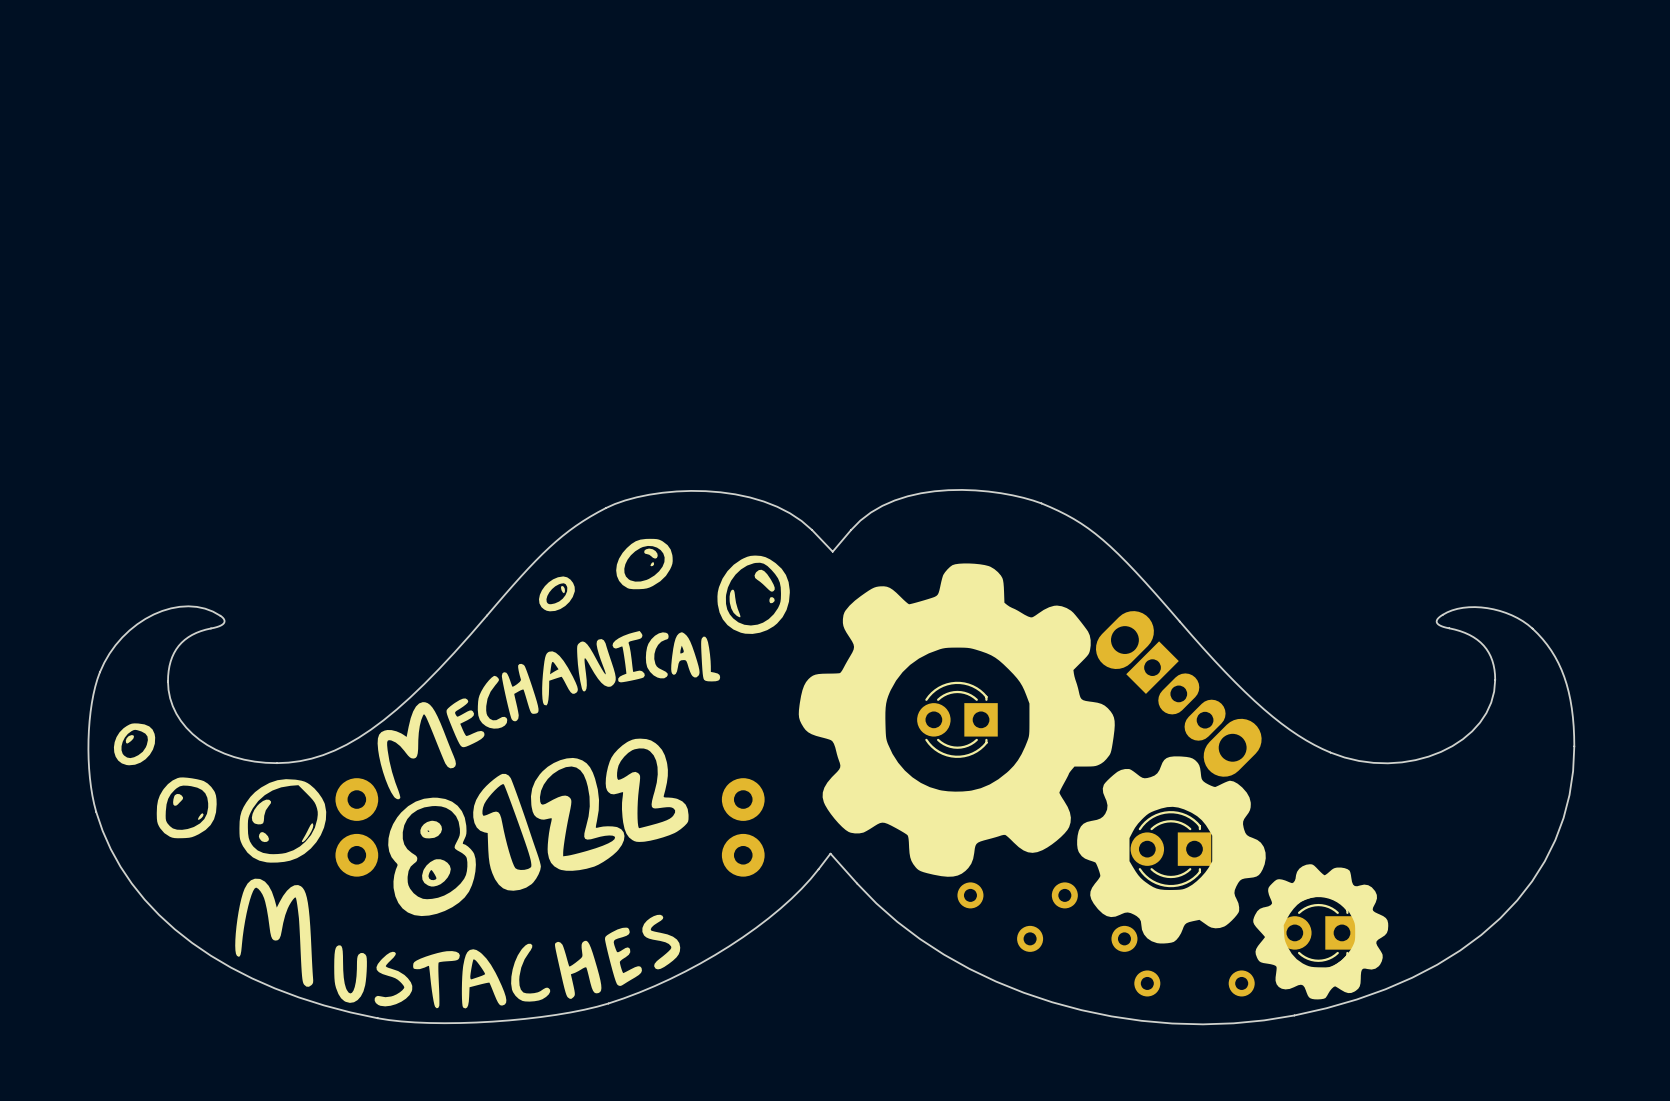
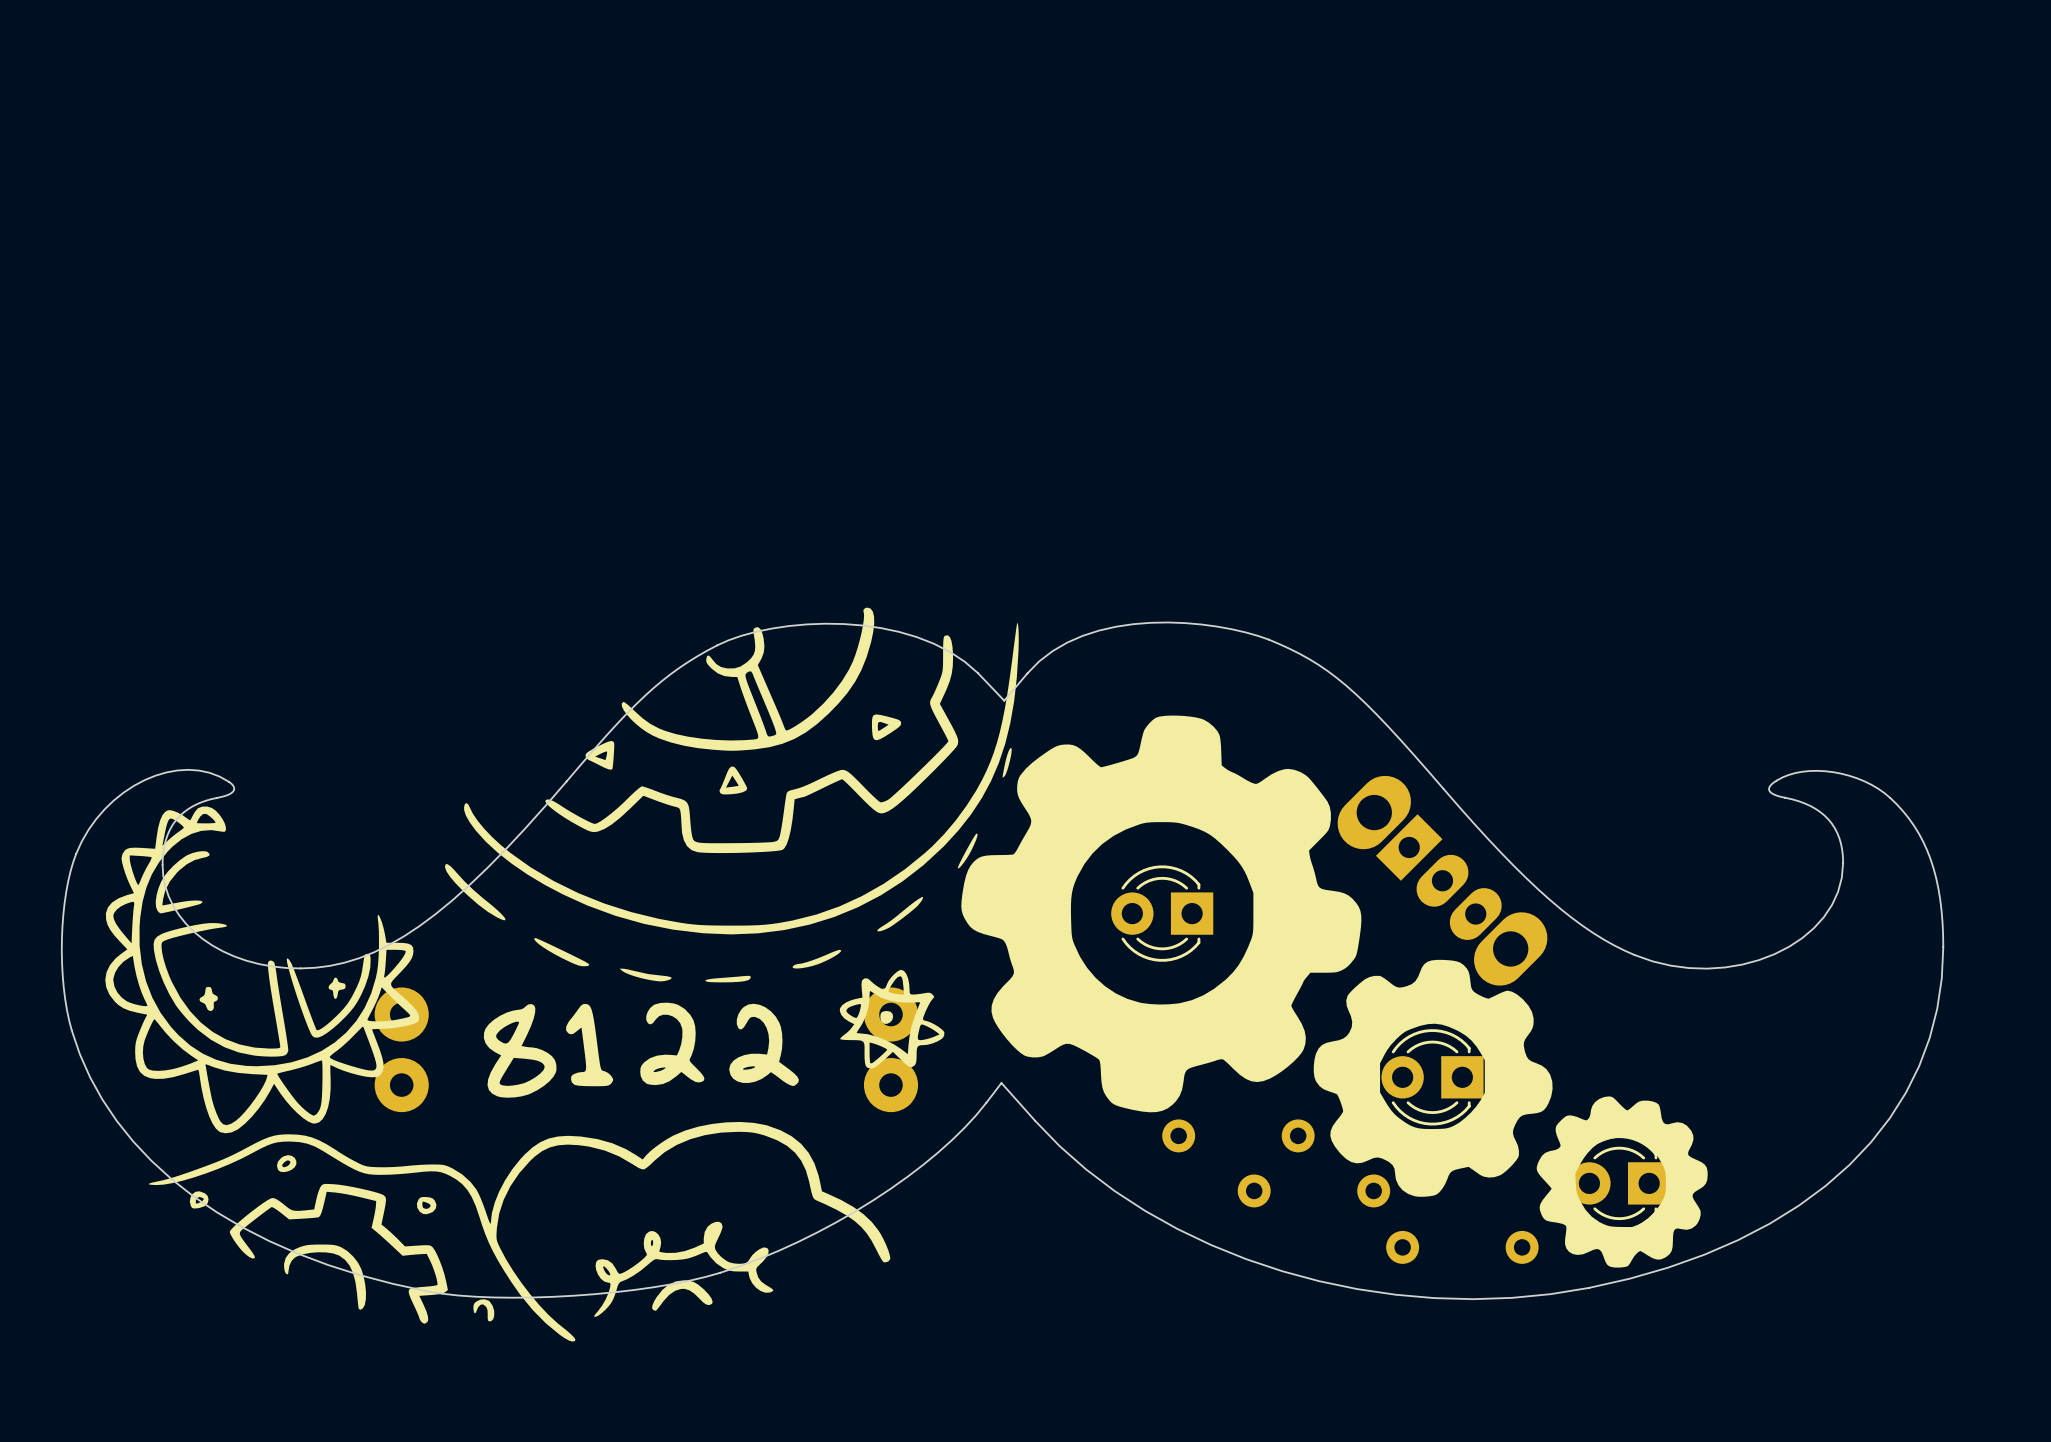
drawing: none -> [105, 607, 1019, 1342]
drawing: [113, 538, 790, 1009] -> none

